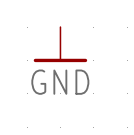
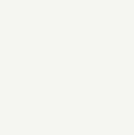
power symbol: GND (60, 44) -> none

